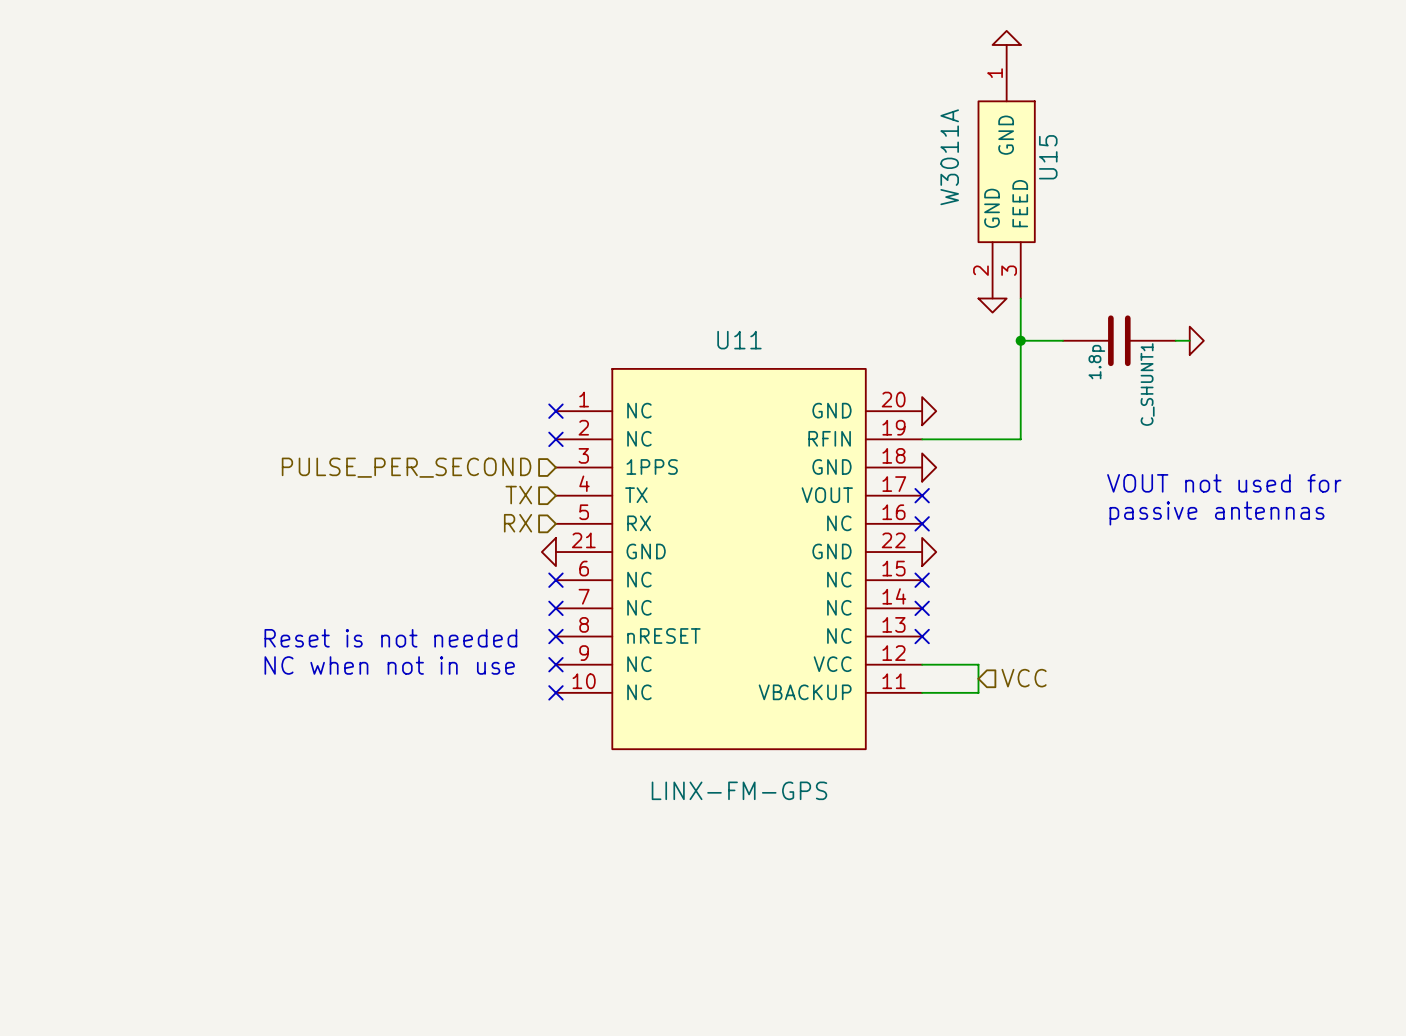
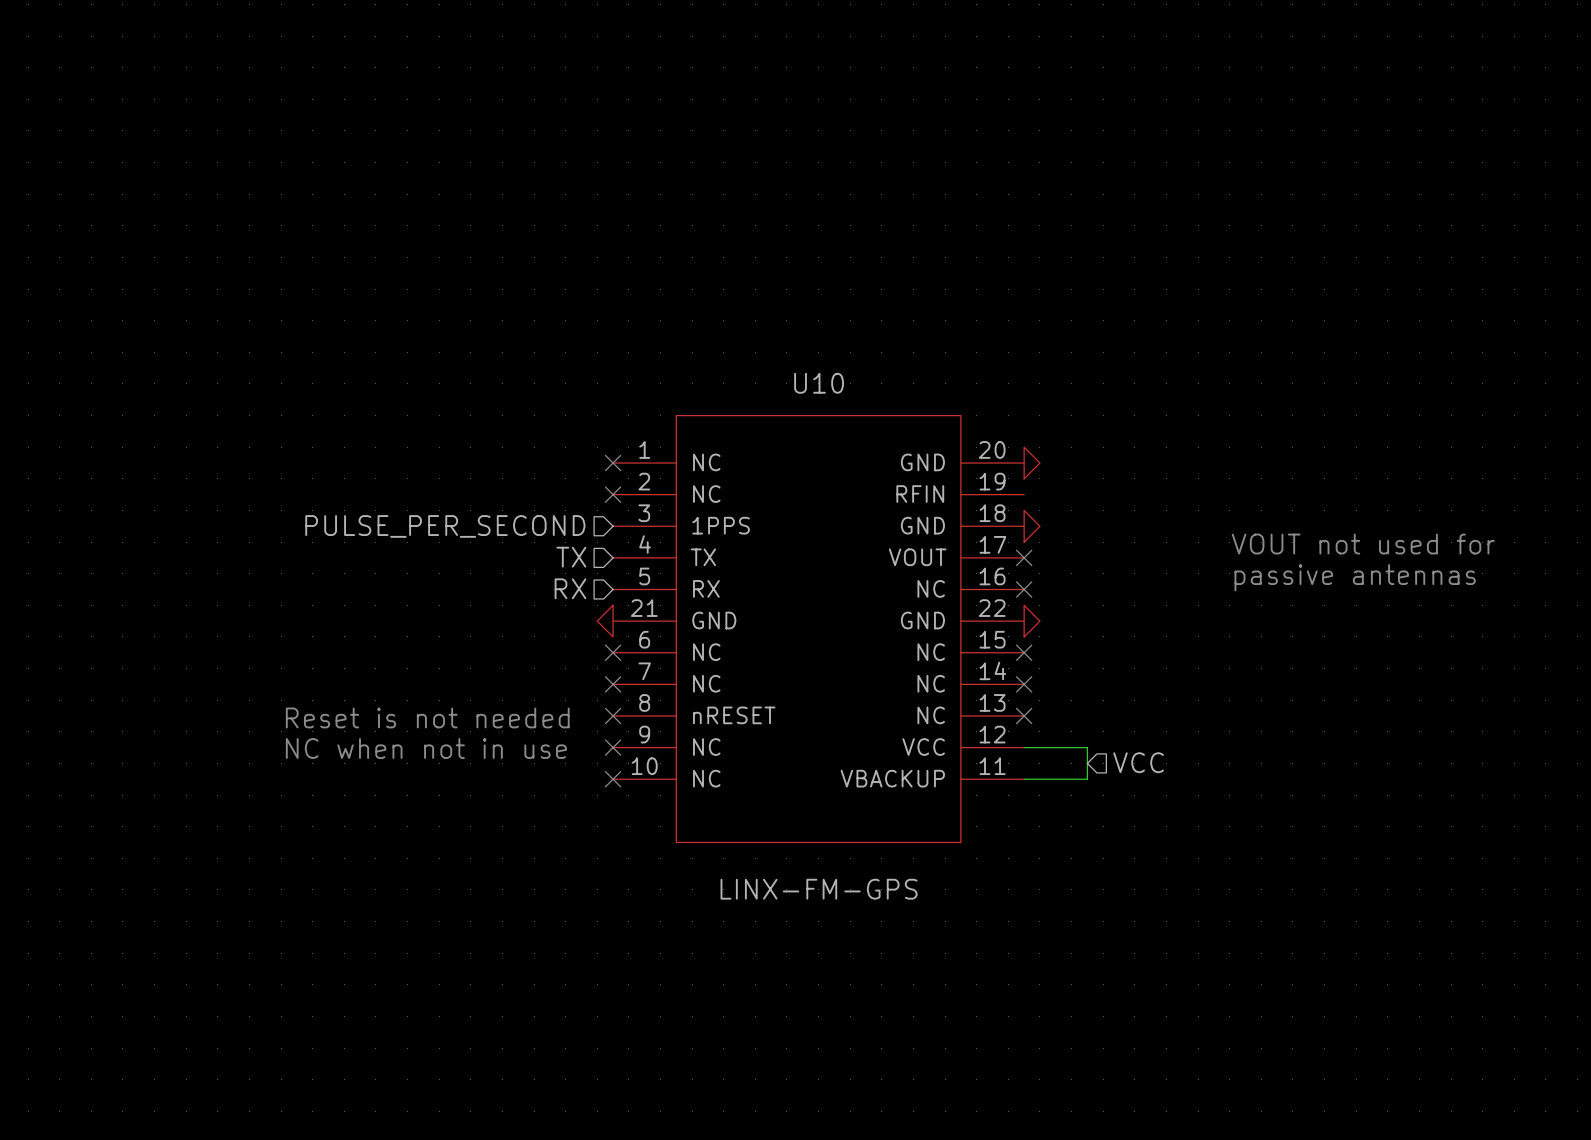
power symbol: (1006, 37) -> none
U15: W3011A (1006, 171) -> none
wire: (1020, 298) (1020, 439) (922, 439) -> none
power symbol: (992, 305) -> none
U11 name: U11 (739, 340) -> U10 (819, 383)
wire: (1020, 340) (1062, 340) -> none
junction: (1020, 340) -> none
C_SHUNT1: 1.8p (1119, 340) -> none
wire: (1175, 340) (1189, 340) -> none
power symbol: (1196, 340) -> none

